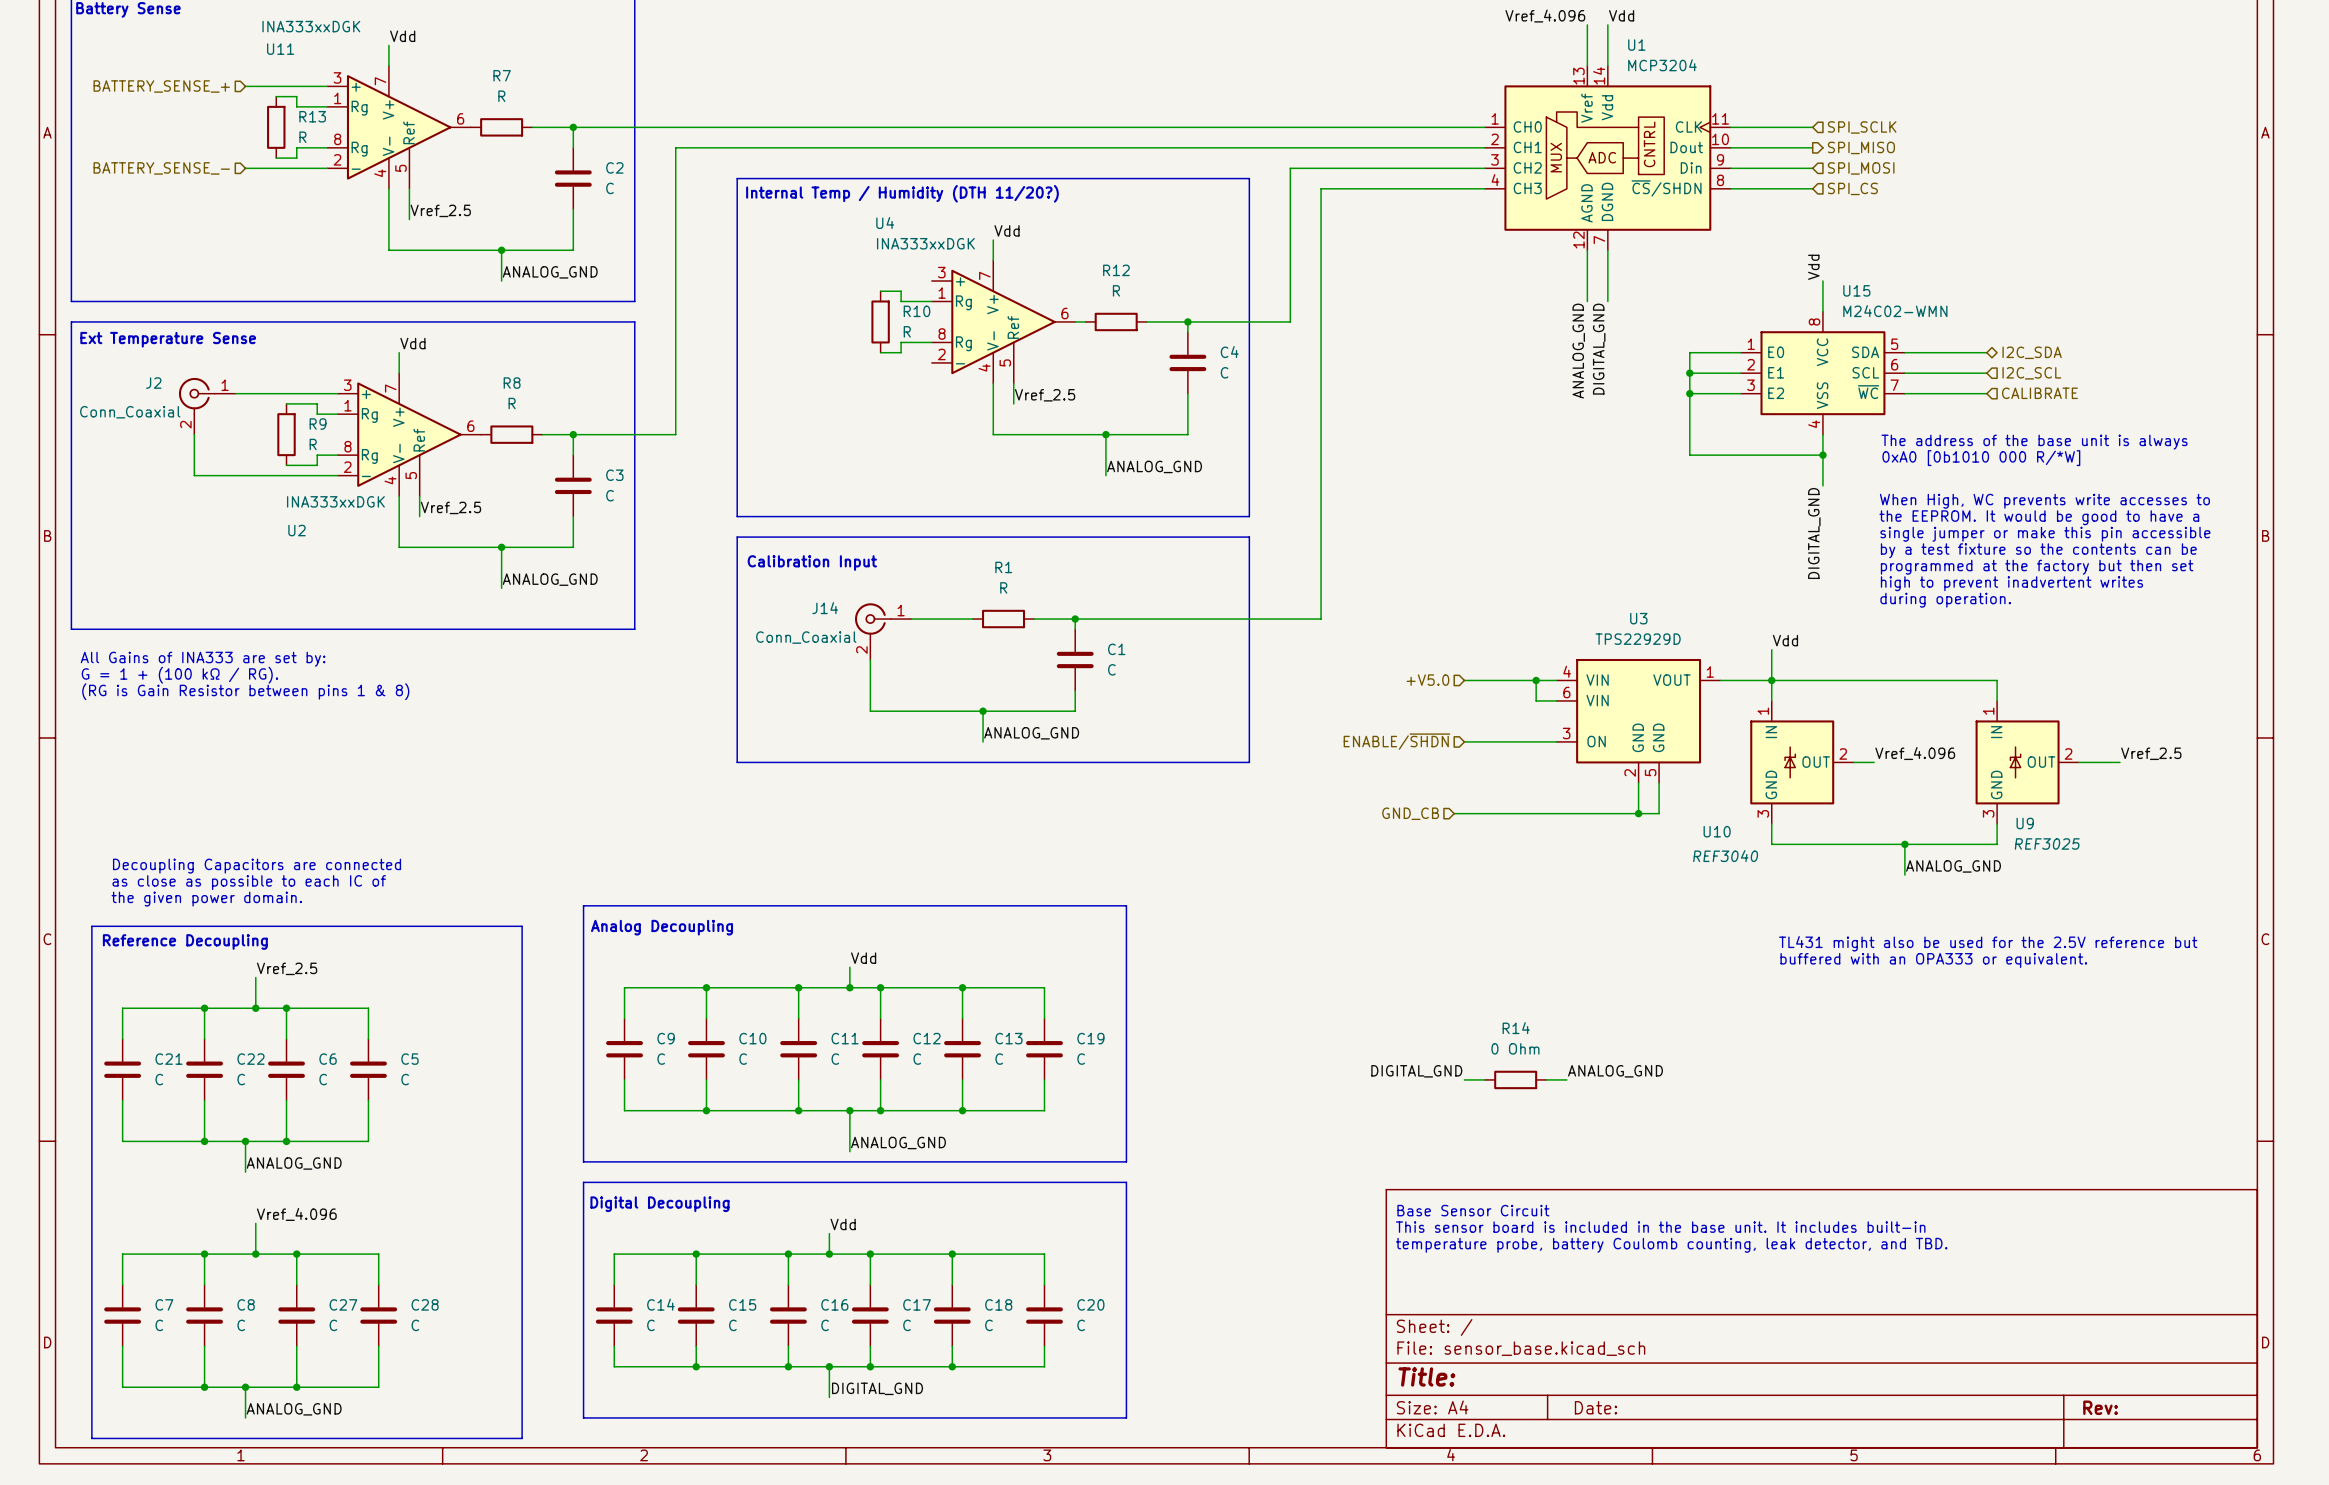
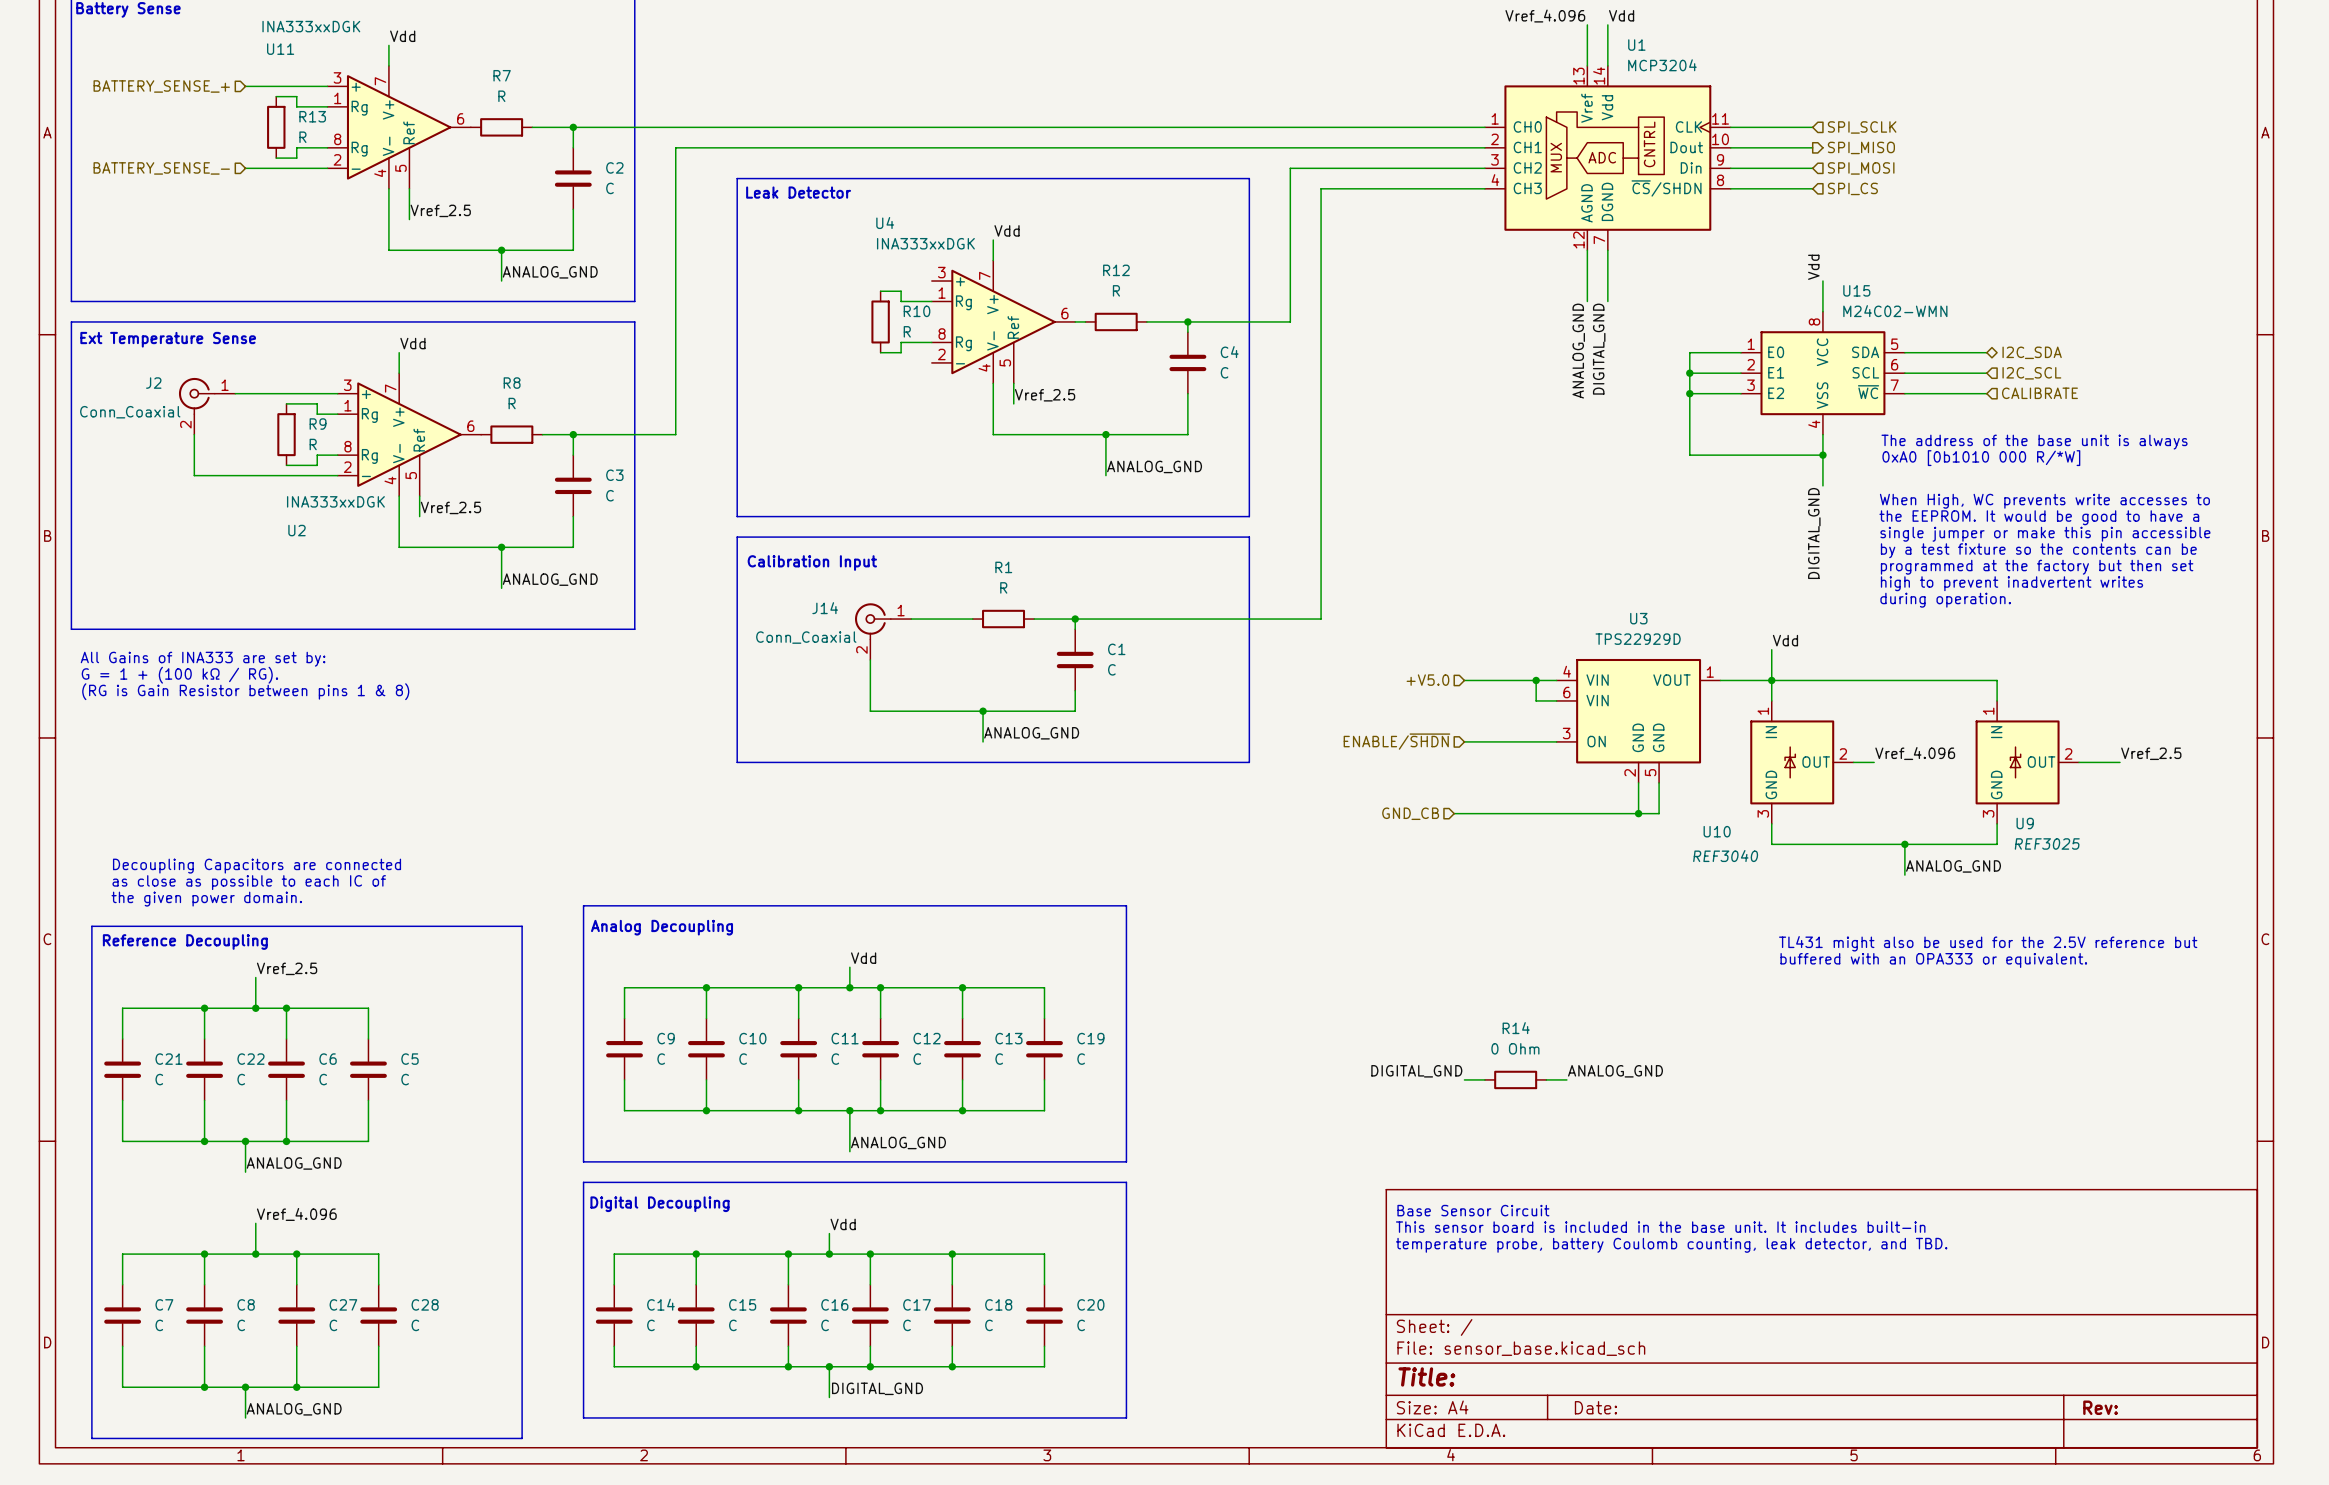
text: Internal Temp / Humidity (DTH 11/20?) (902, 193) -> Leak Detector (798, 192)

